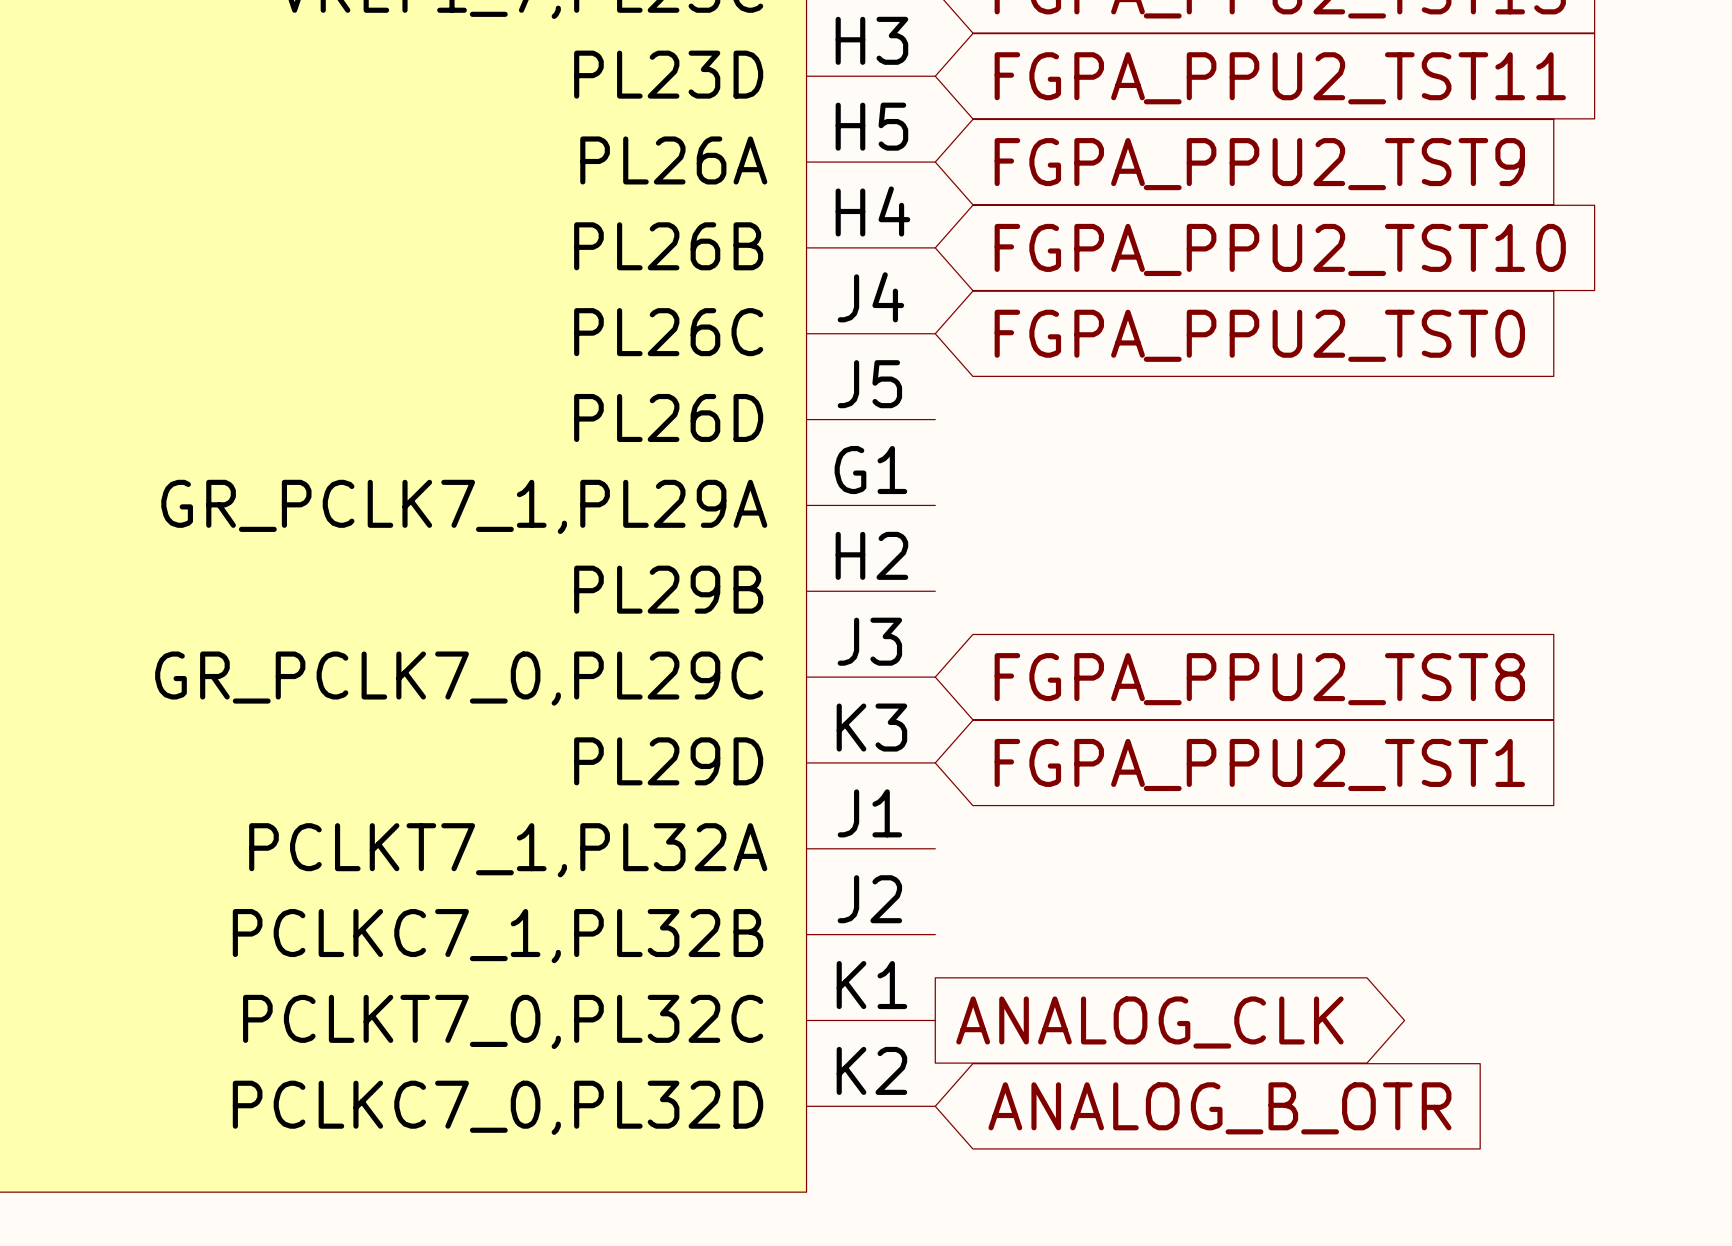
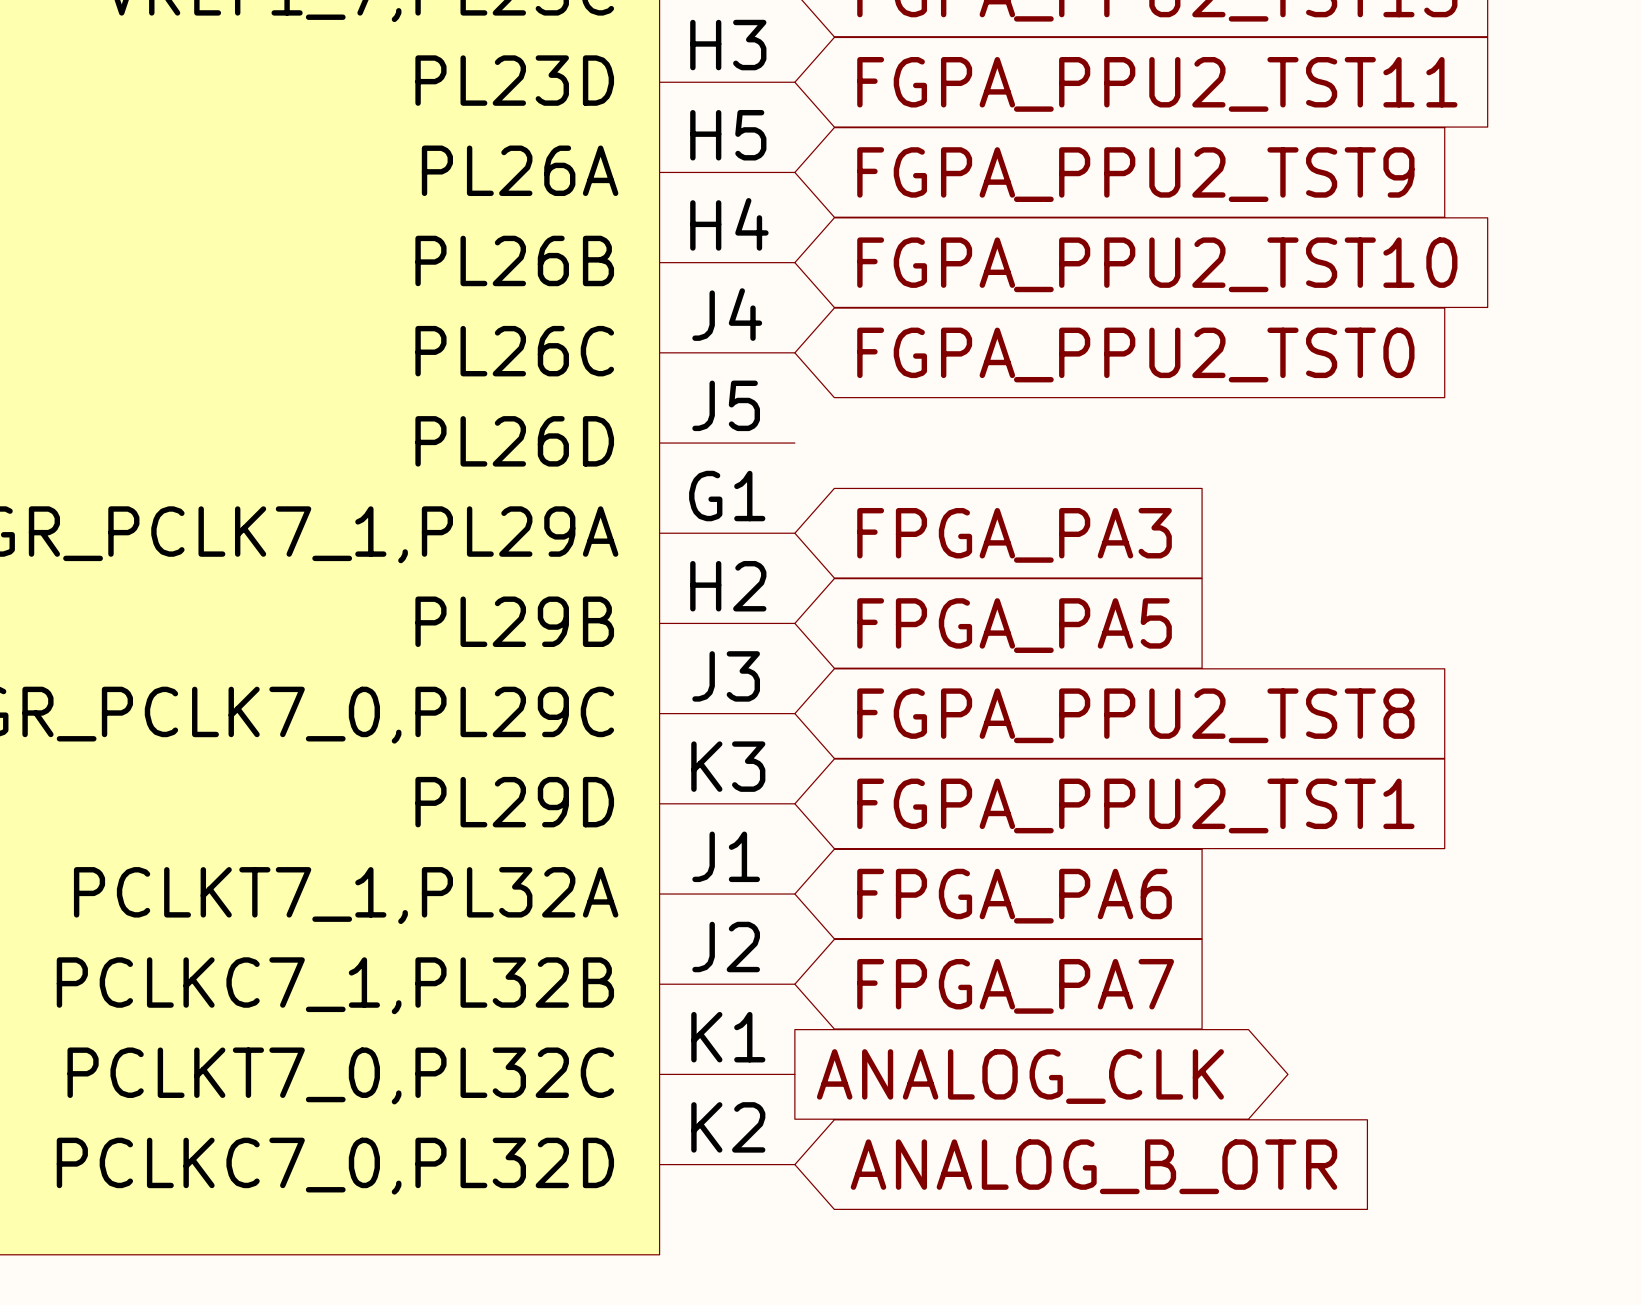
global label: none -> FPGA_PA3 (1014, 535)
global label: none -> FPGA_PA5 (1014, 625)
global label: none -> FPGA_PA6 (1014, 896)
global label: none -> FPGA_PA7 (1015, 986)

